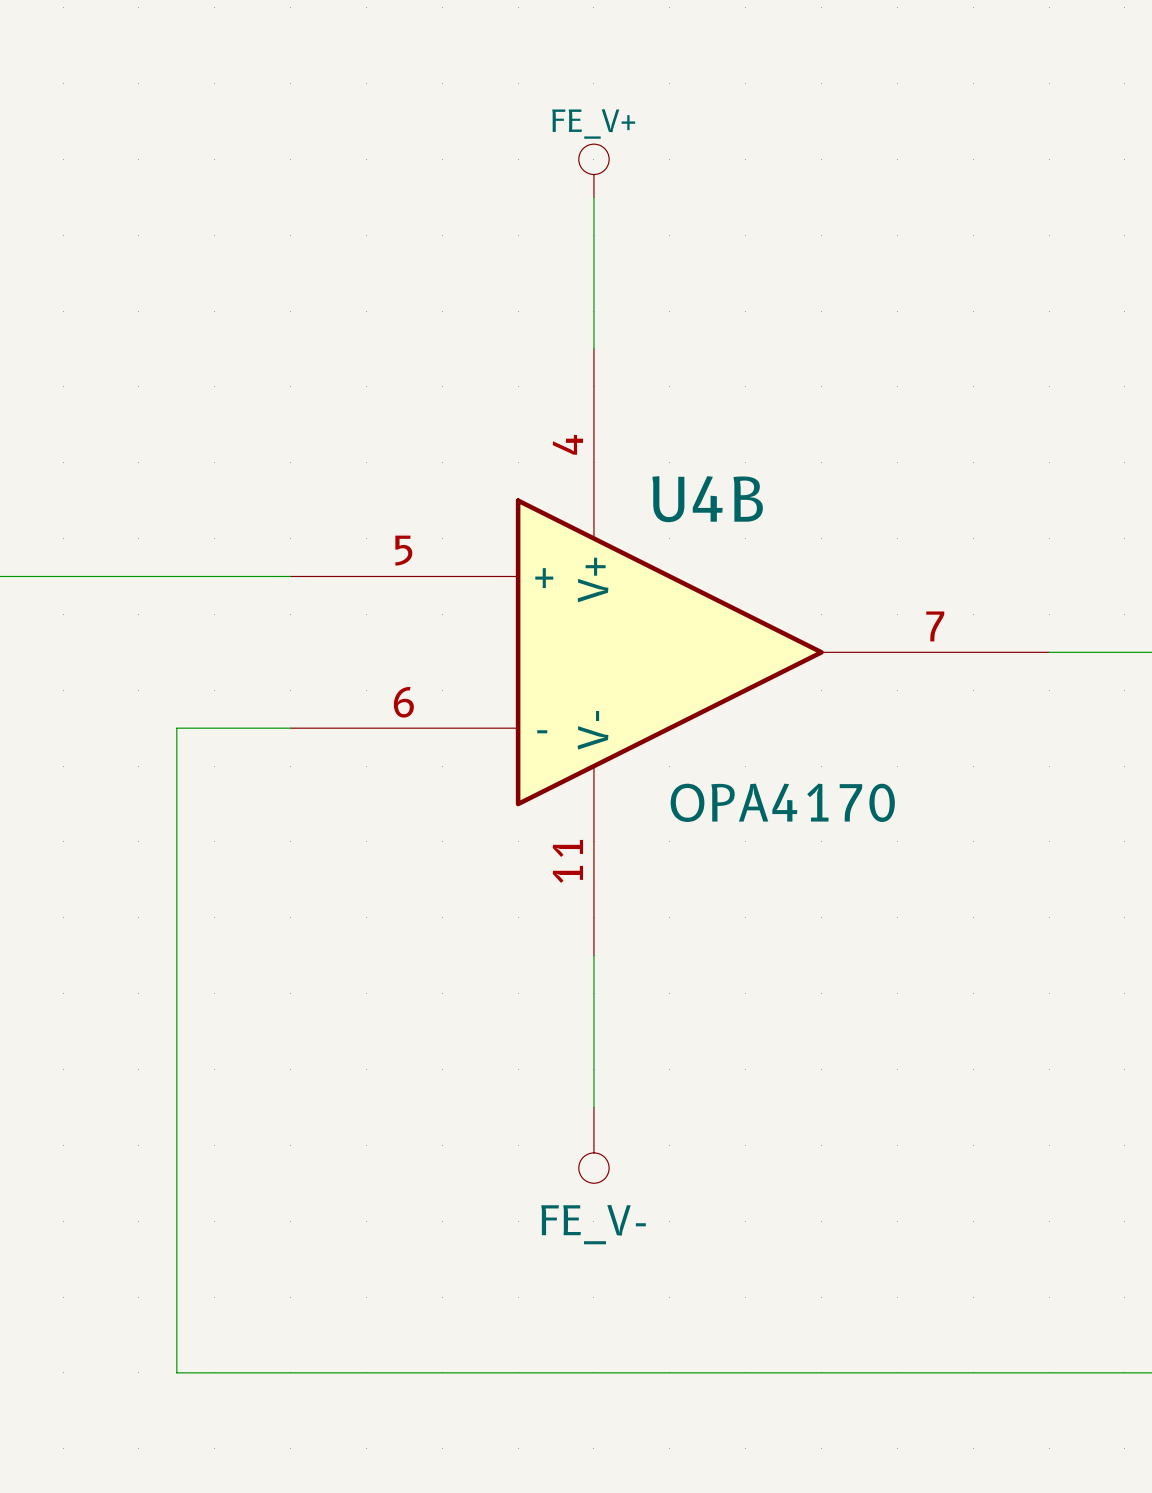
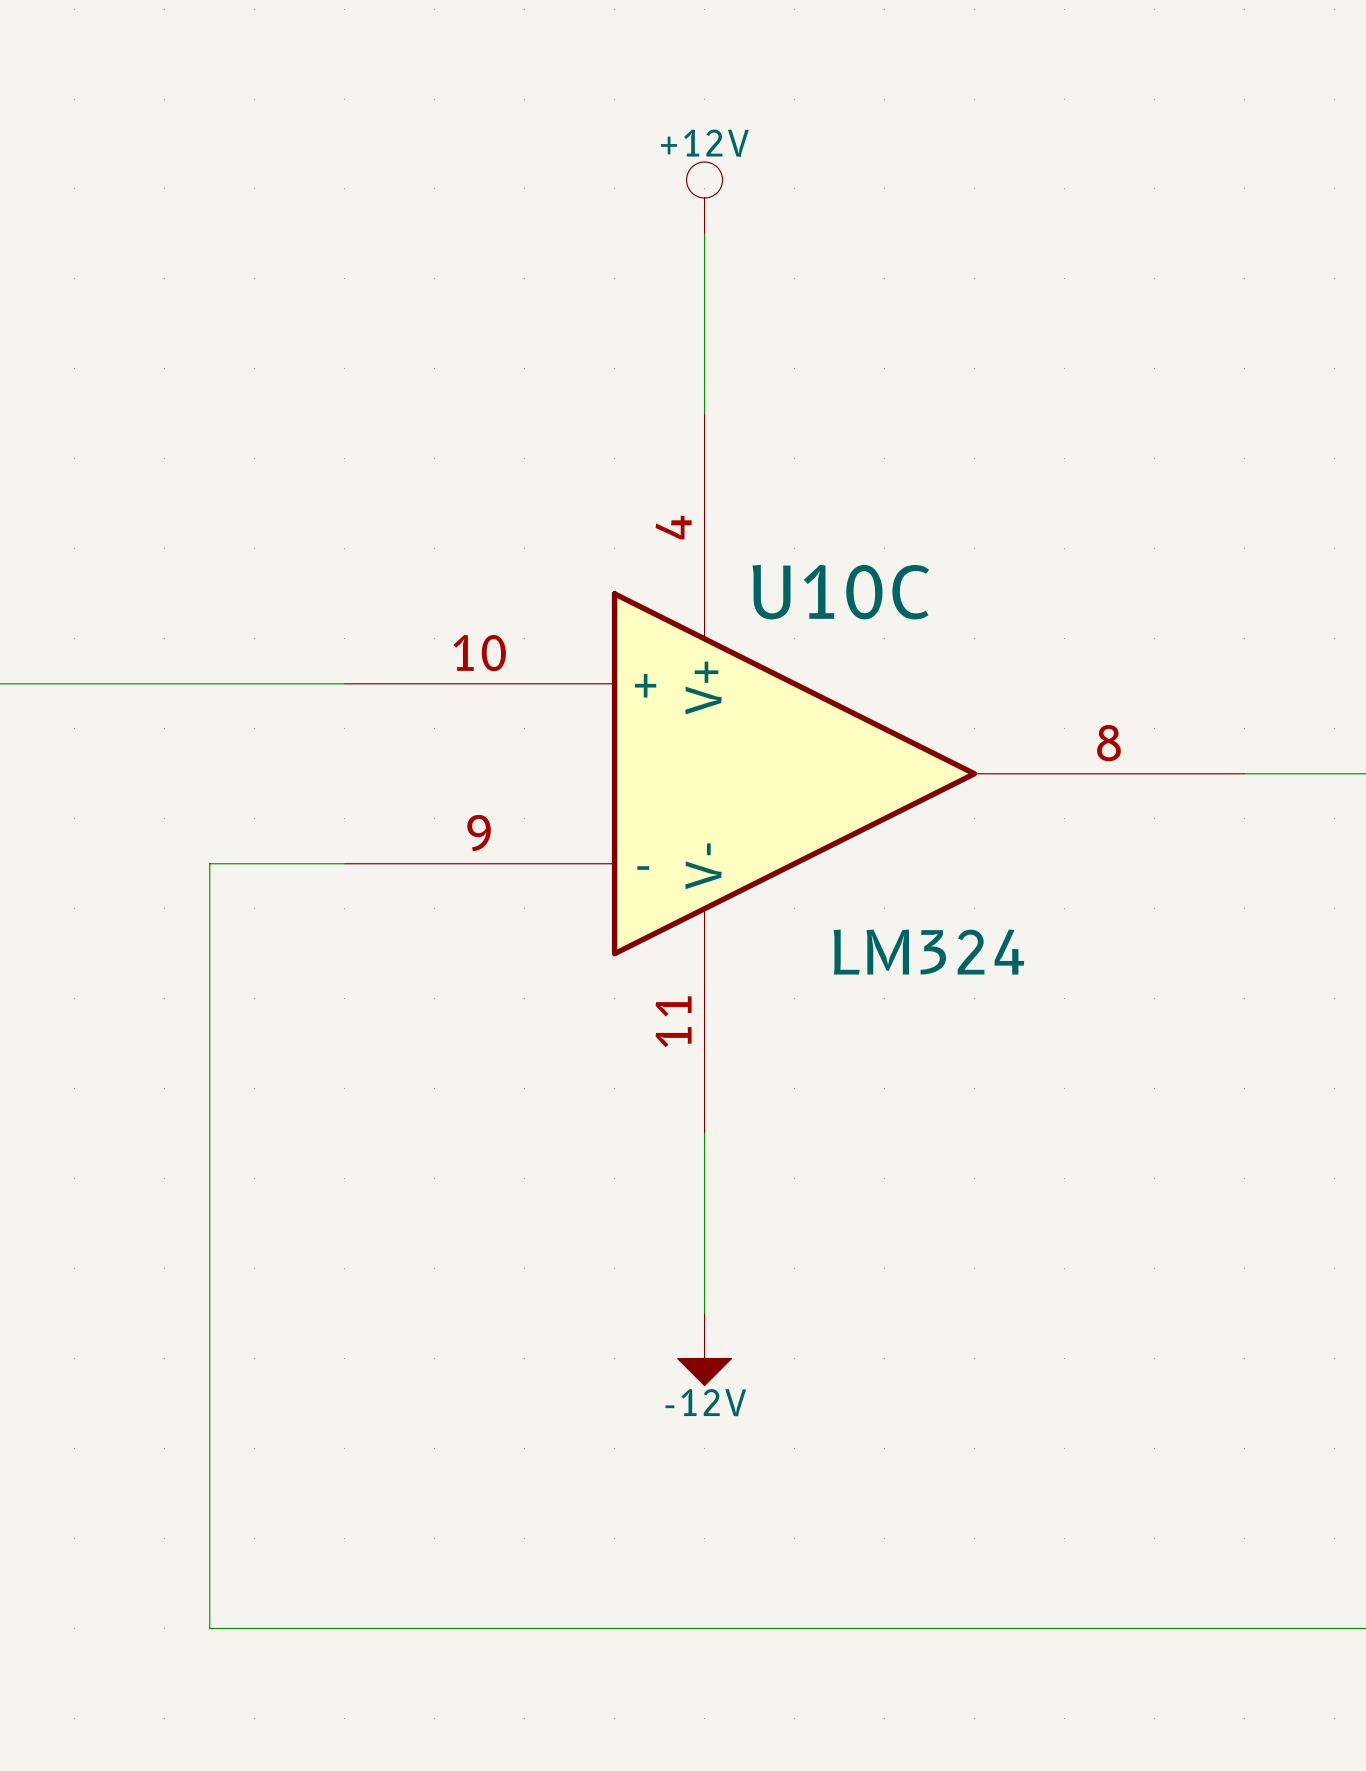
power symbol: FE_V+ (593, 170) -> +12V (704, 197)
U4B name: U4B (707, 499) -> U10C (840, 592)
U4B pin number: 5 (403, 550) -> 10 (479, 653)
U4B pin number: 7 (935, 626) -> 8 (1108, 743)
U4B pin number: 6 (403, 702) -> 9 (479, 833)
U4B value: OPA4170 (782, 802) -> LM324 (928, 952)
power symbol: FE_V- (593, 1145) -> -12V (704, 1349)

